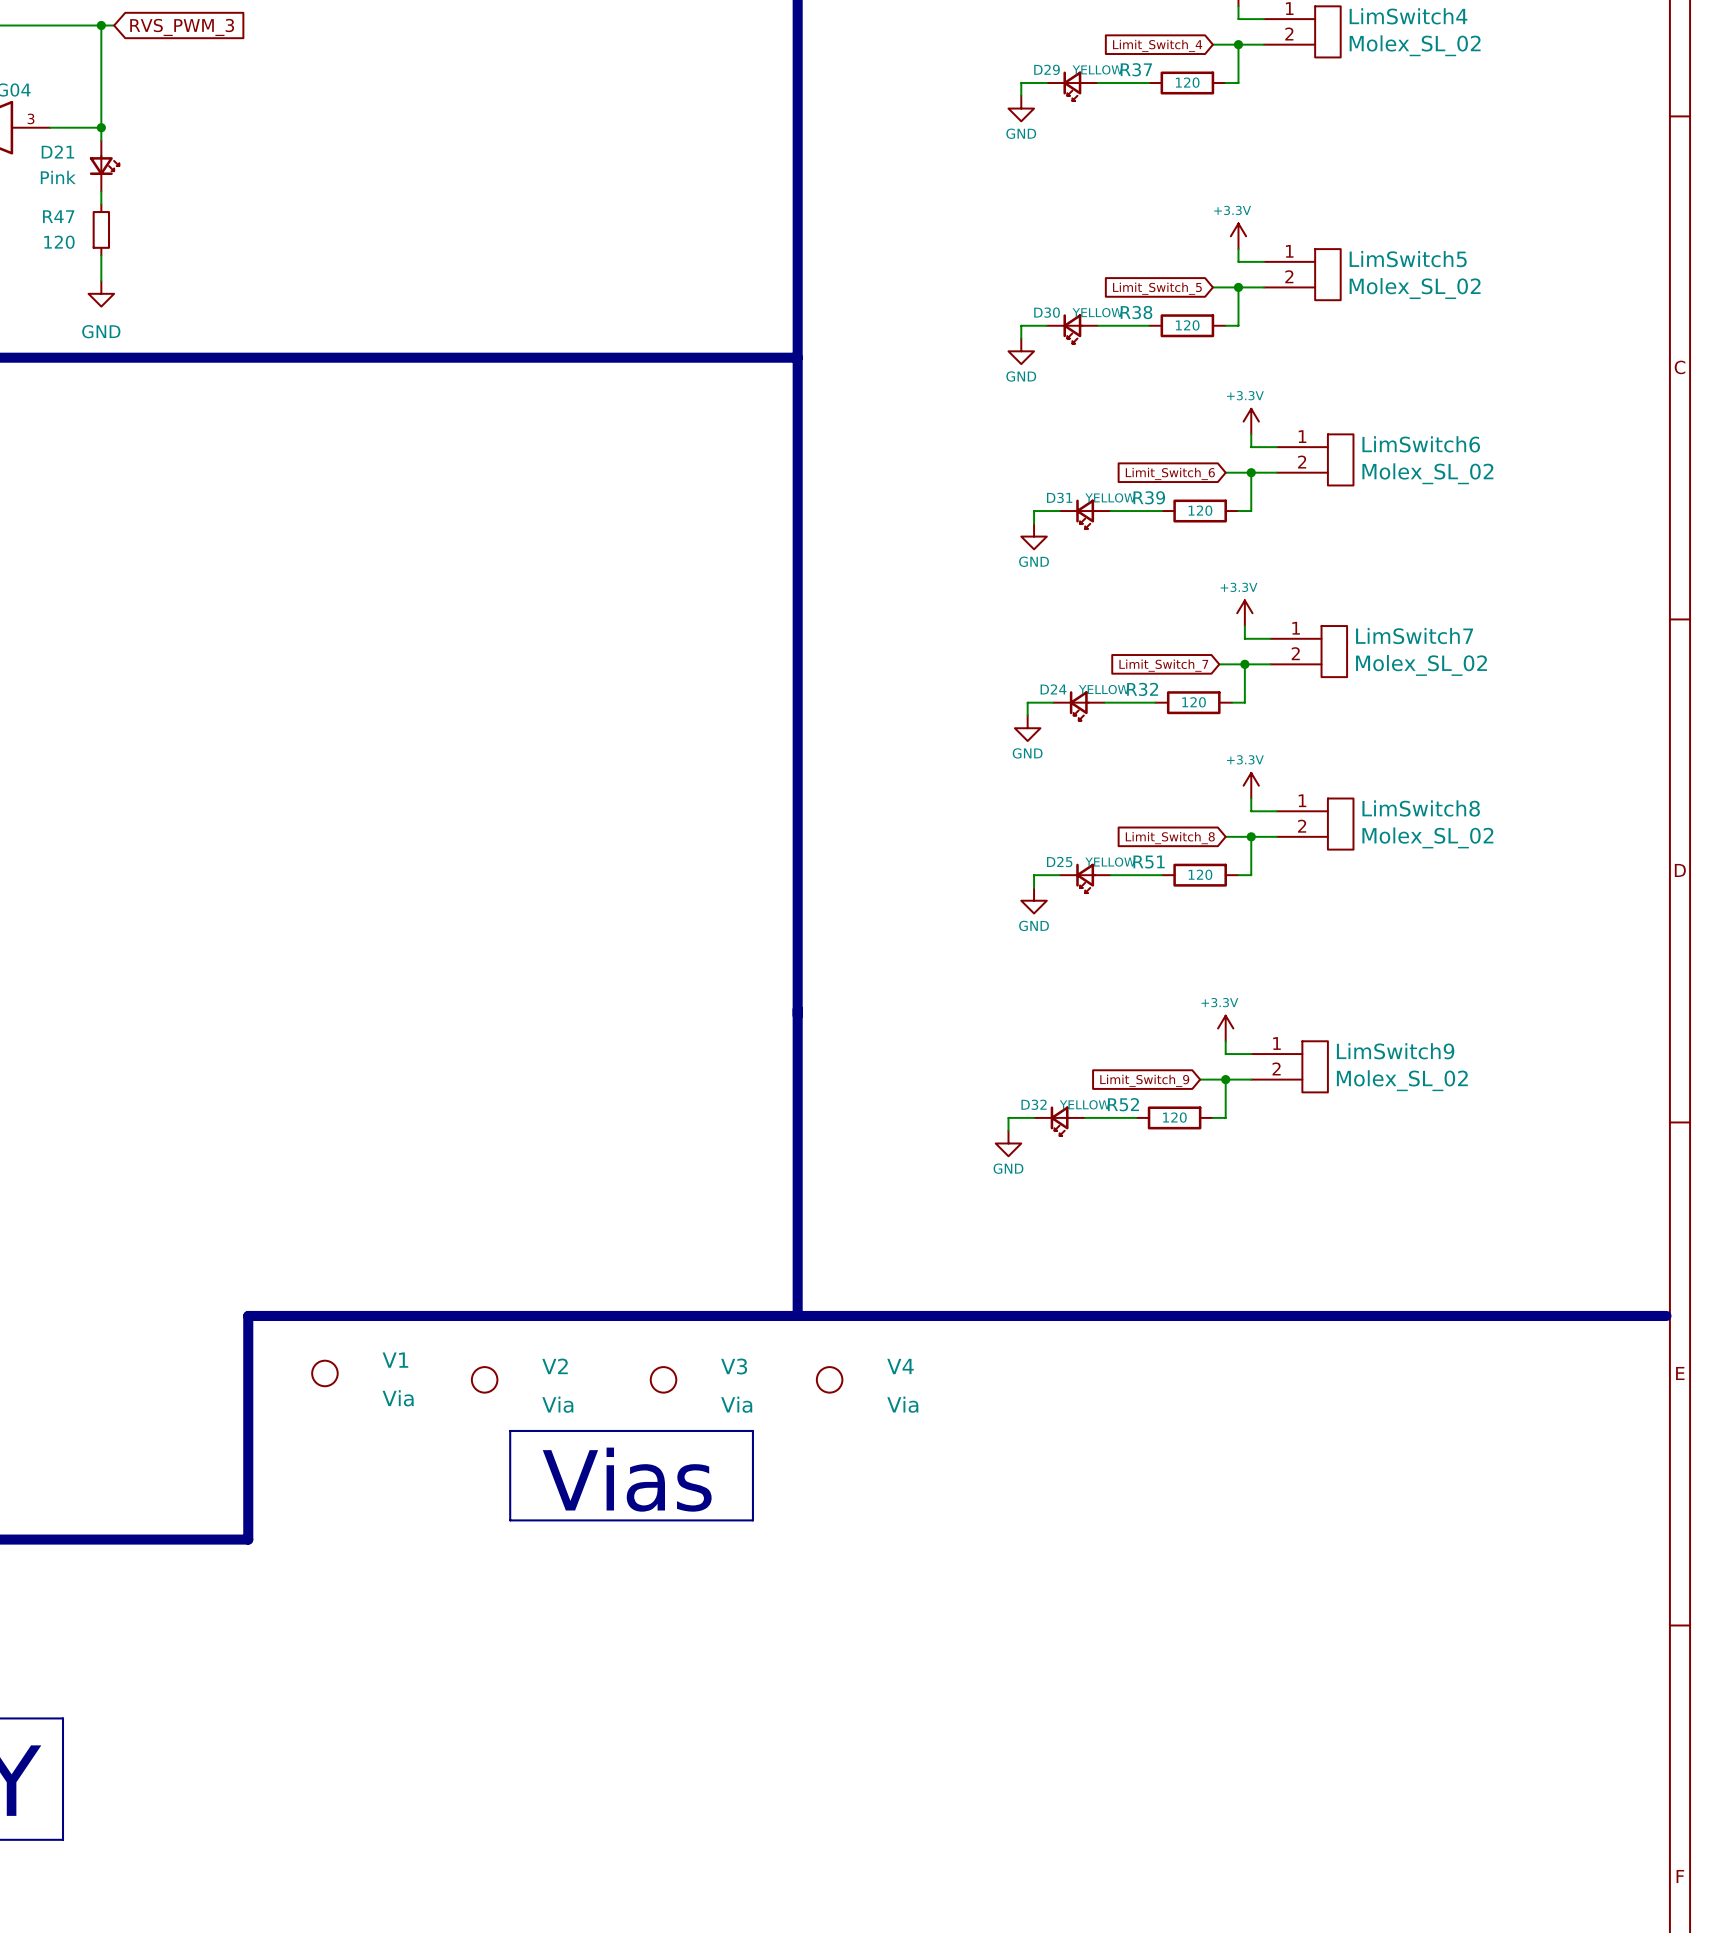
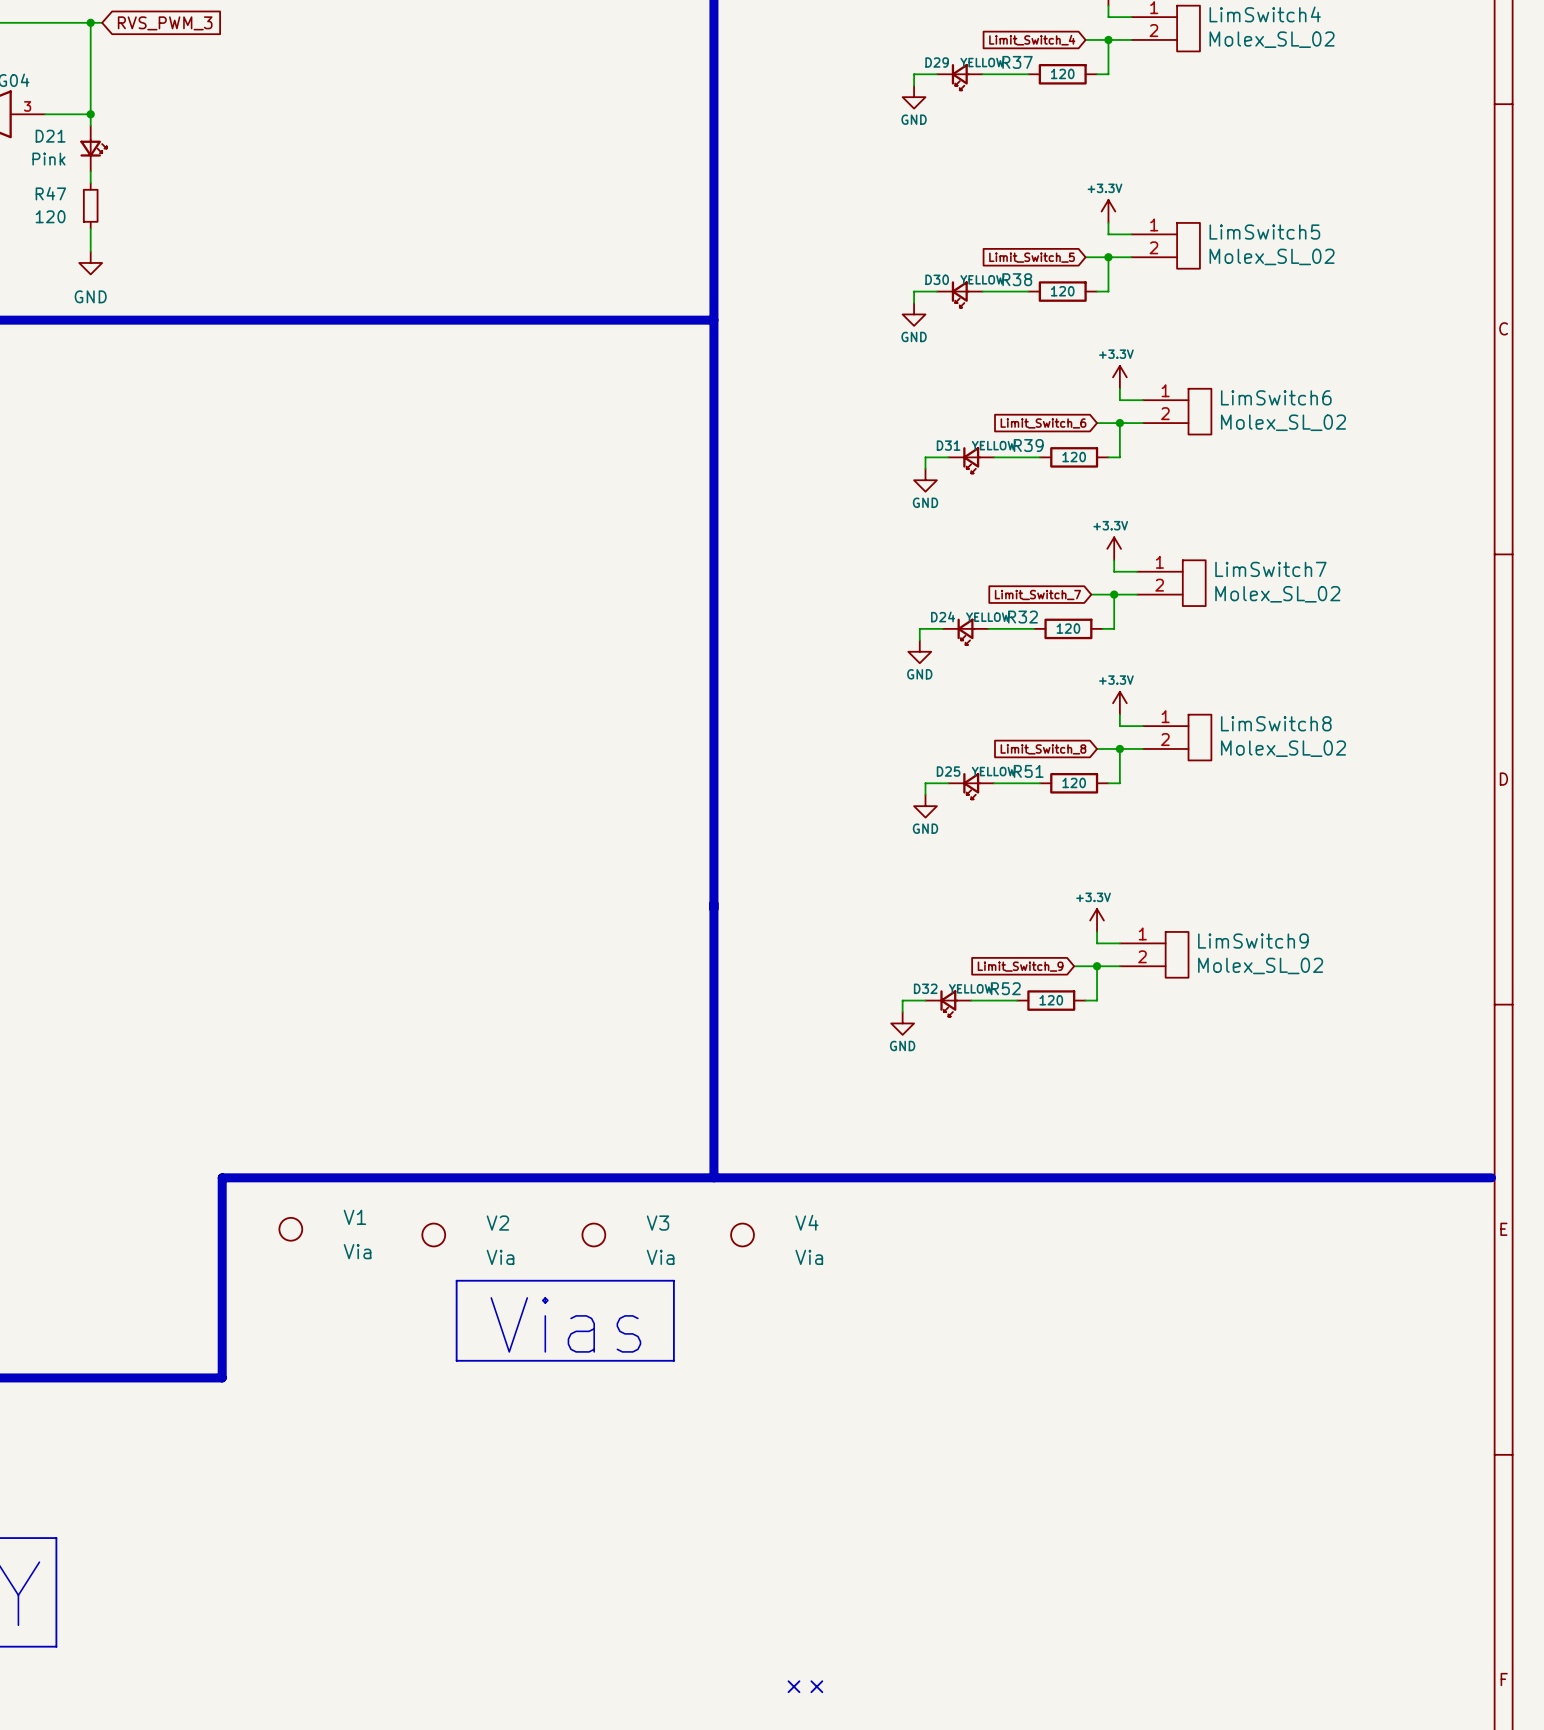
no-connect mark: none -> (793, 1686)
no-connect mark: none -> (816, 1686)

